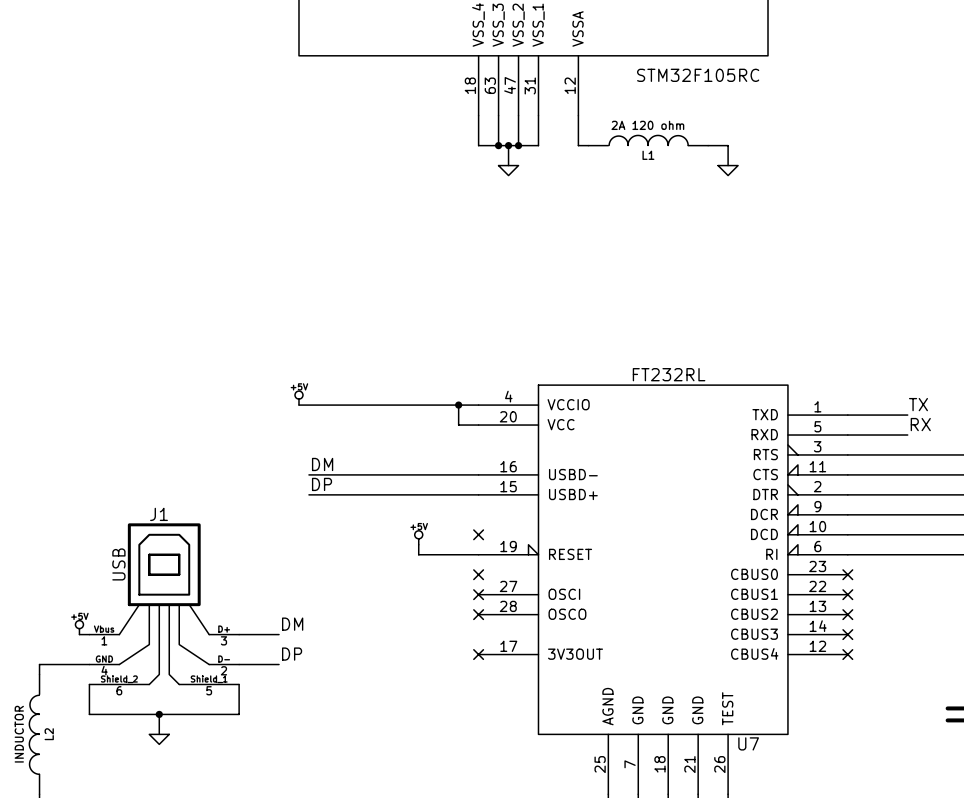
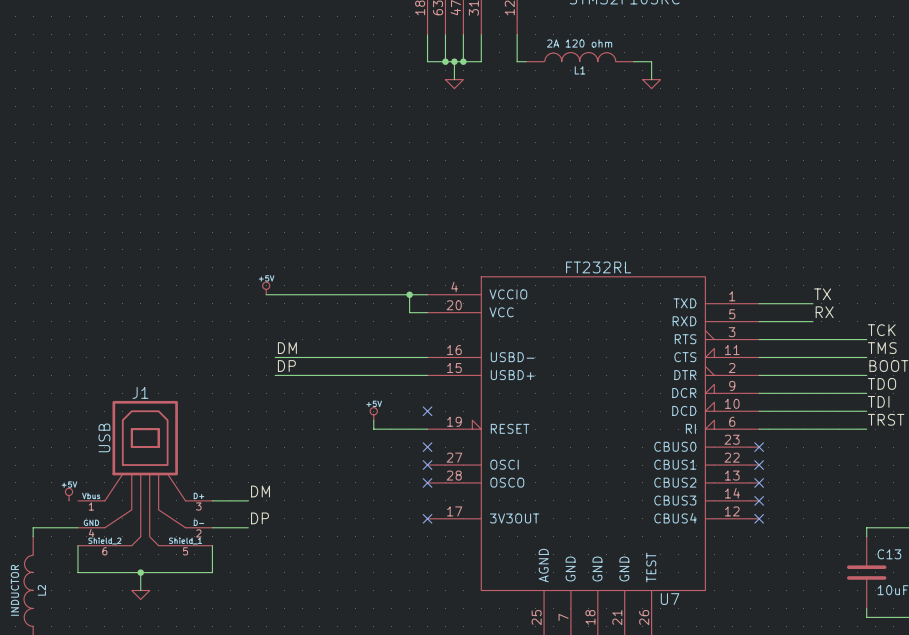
wire: (79, 634) (89, 634) -> none

